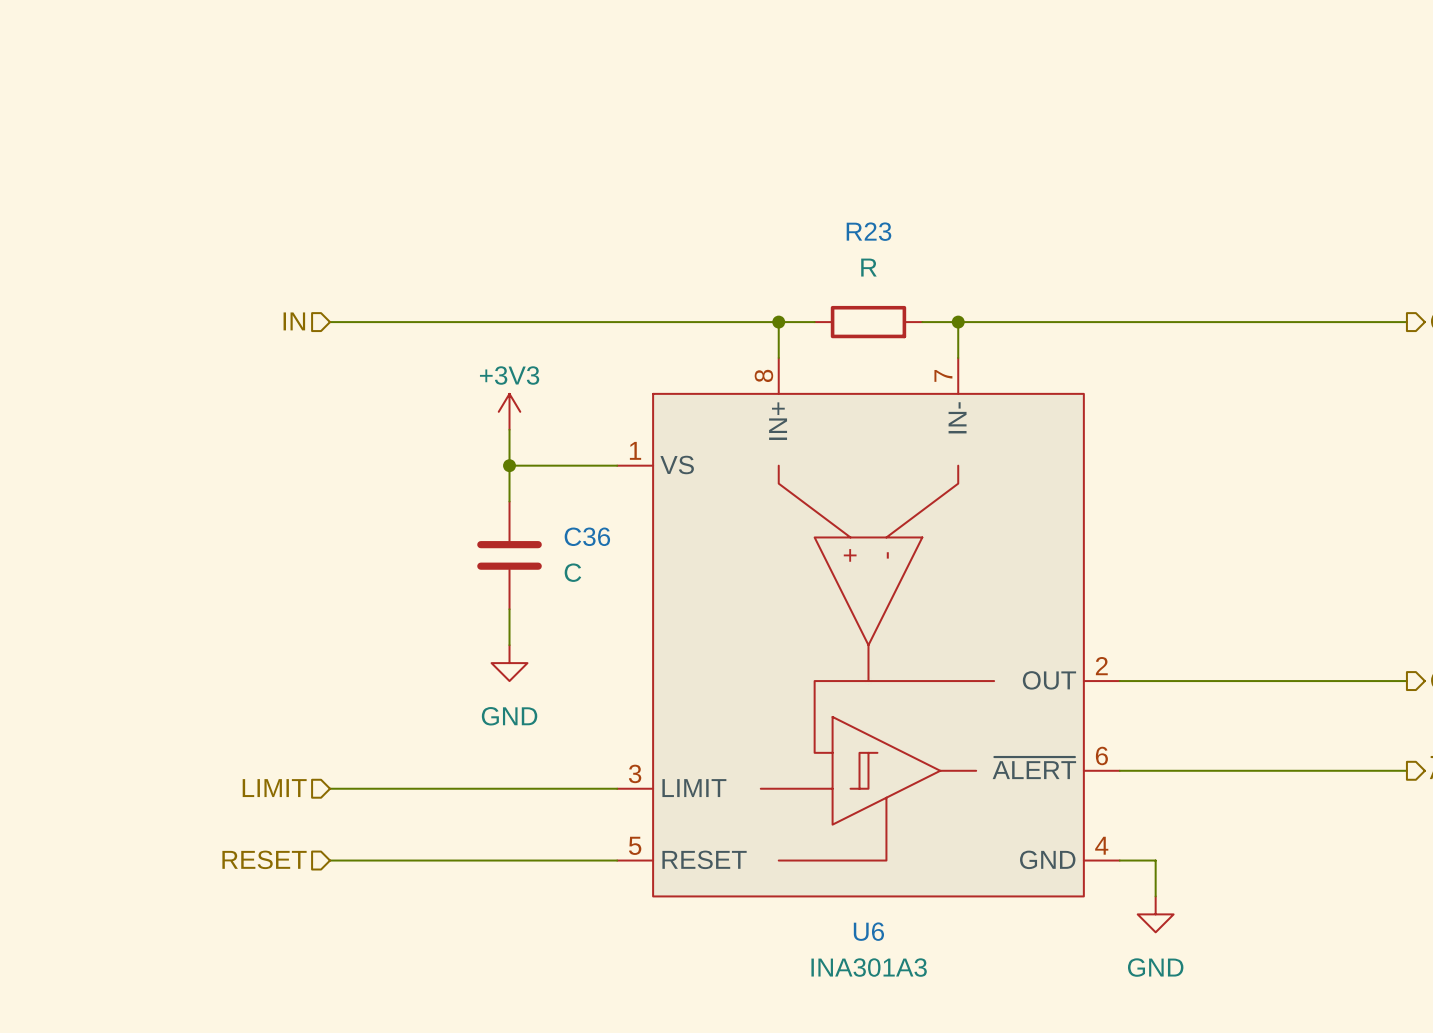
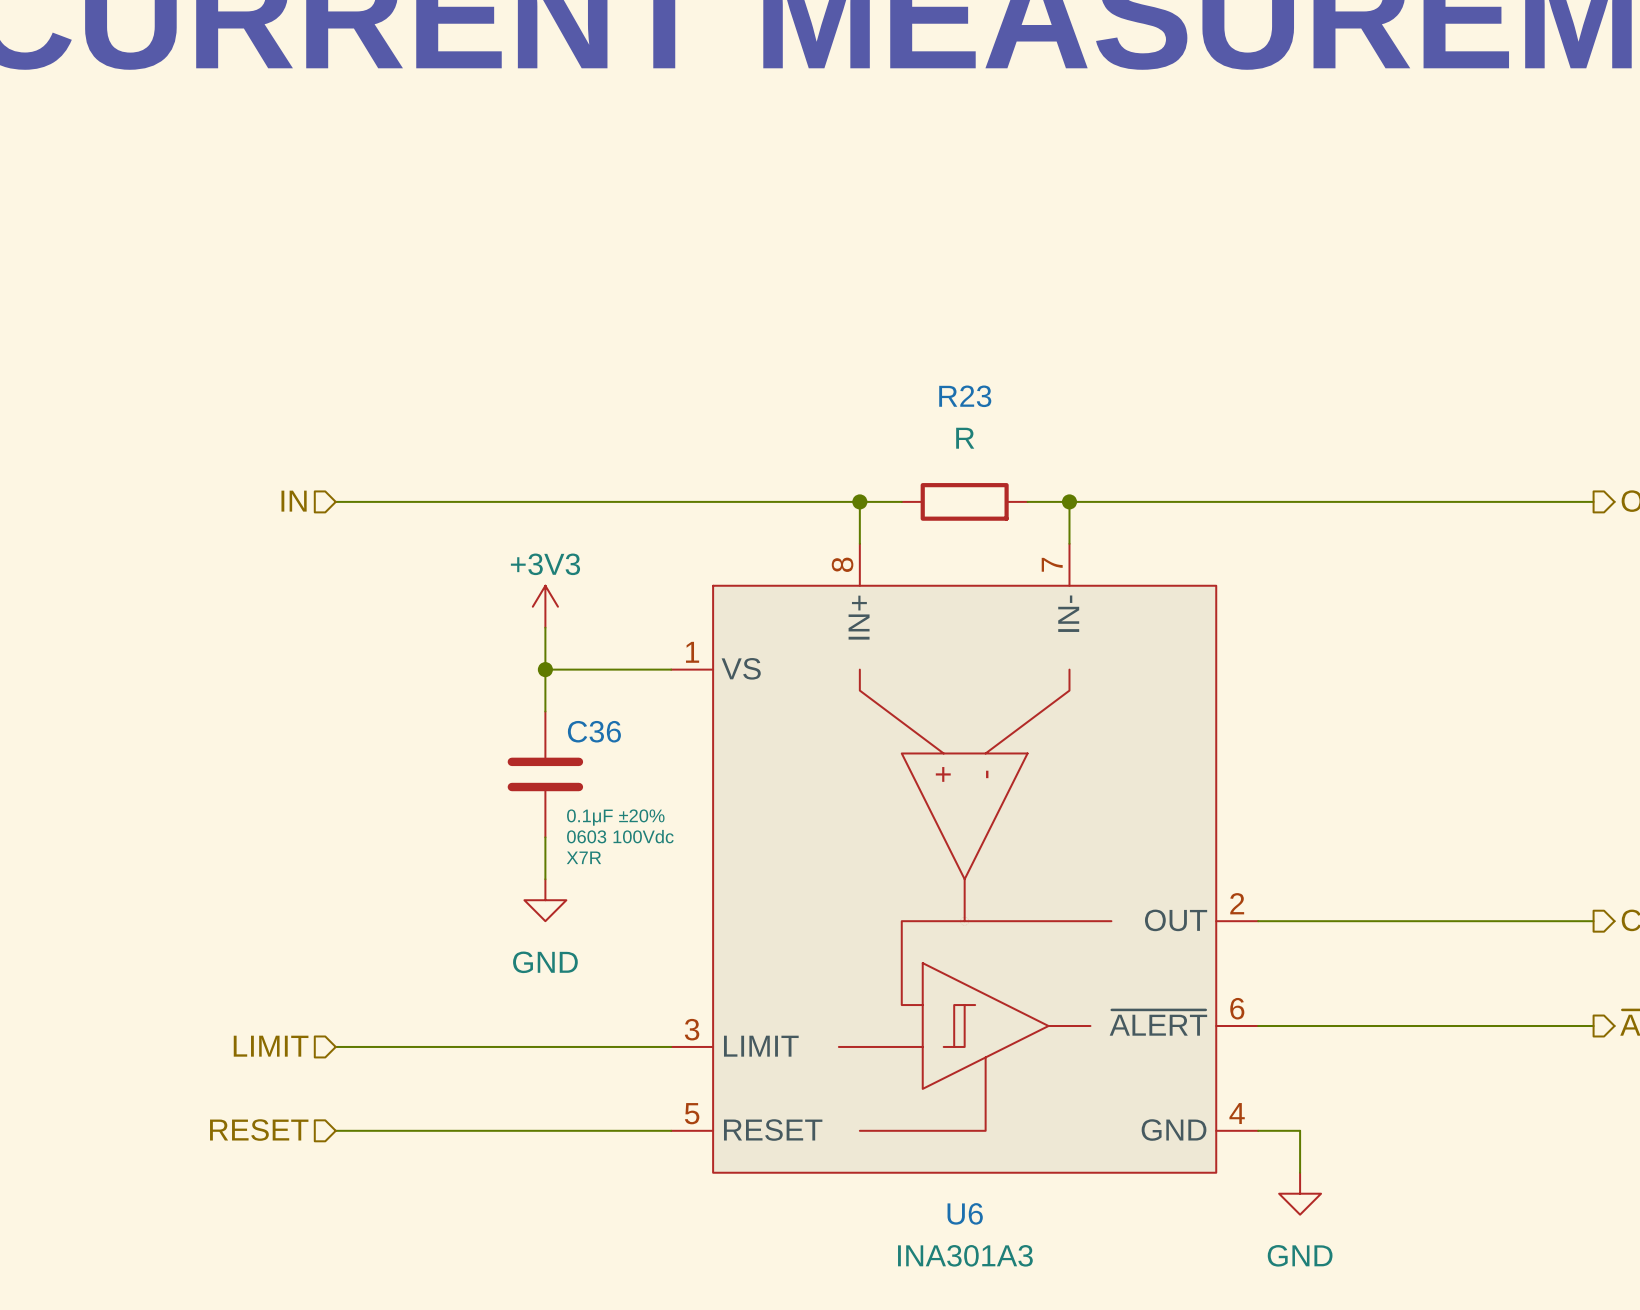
C36 name position: C36 (587, 536) -> C36 (594, 731)
C36 value: C (572, 572) -> none
C36 text: none -> 0.1μF ±20% (615, 817)
C36 text: none -> 0603 100Vdc (620, 836)
C36 text: none -> X7R (583, 857)

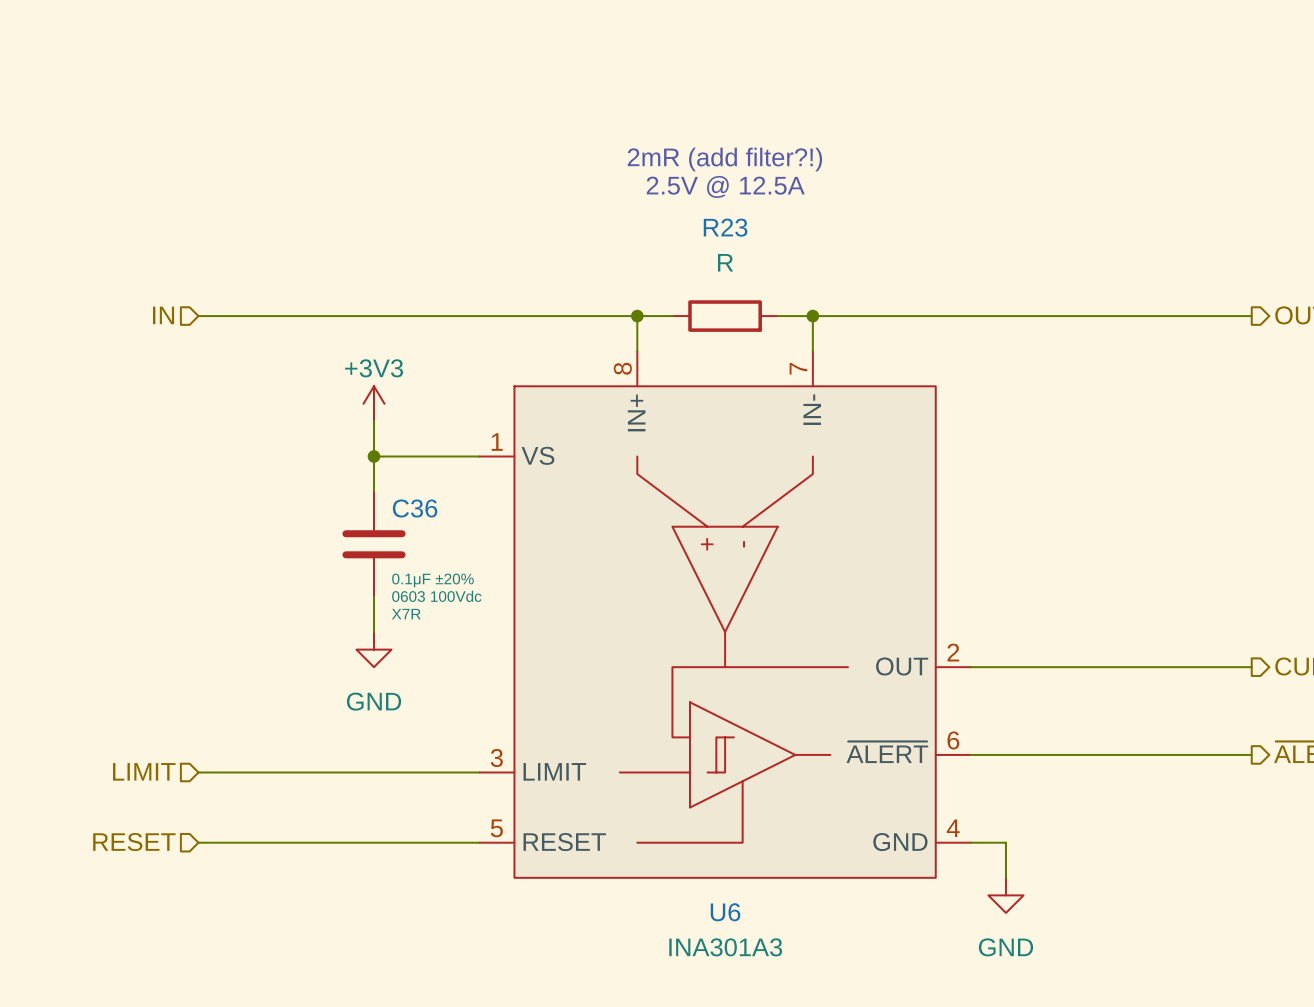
text: none -> 2mR (add filter?!) (724, 159)
text: none -> 2.5V @ 12.5A (725, 186)

